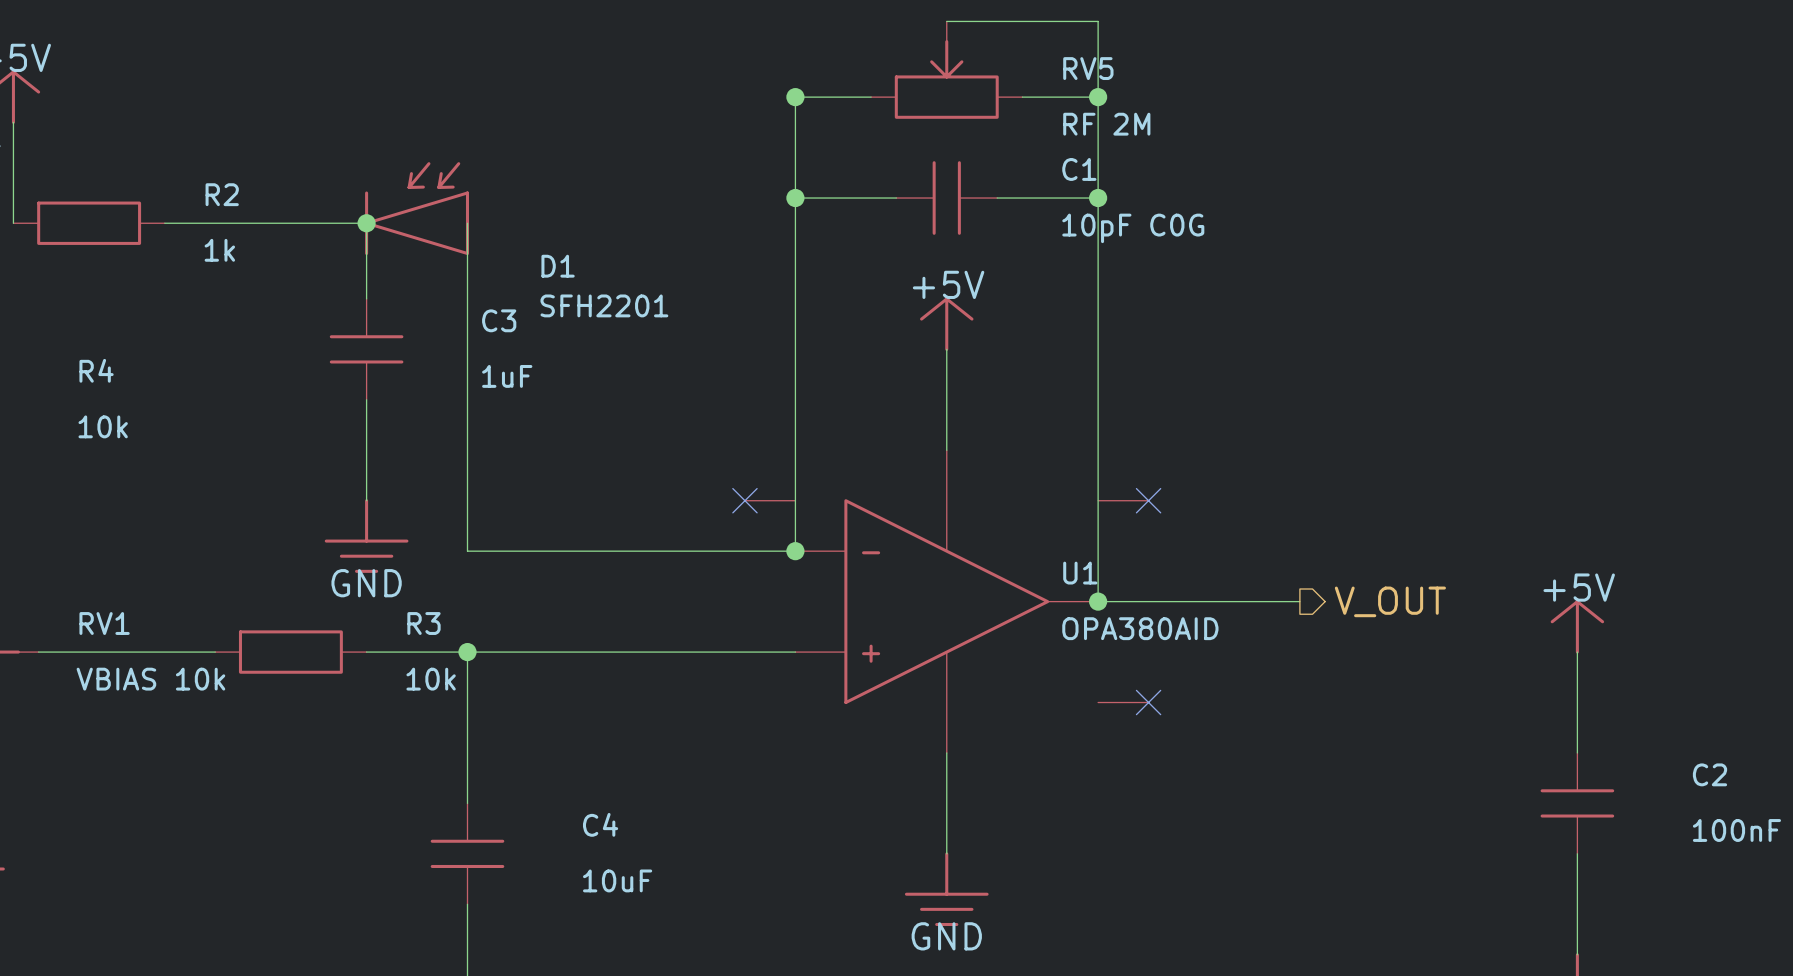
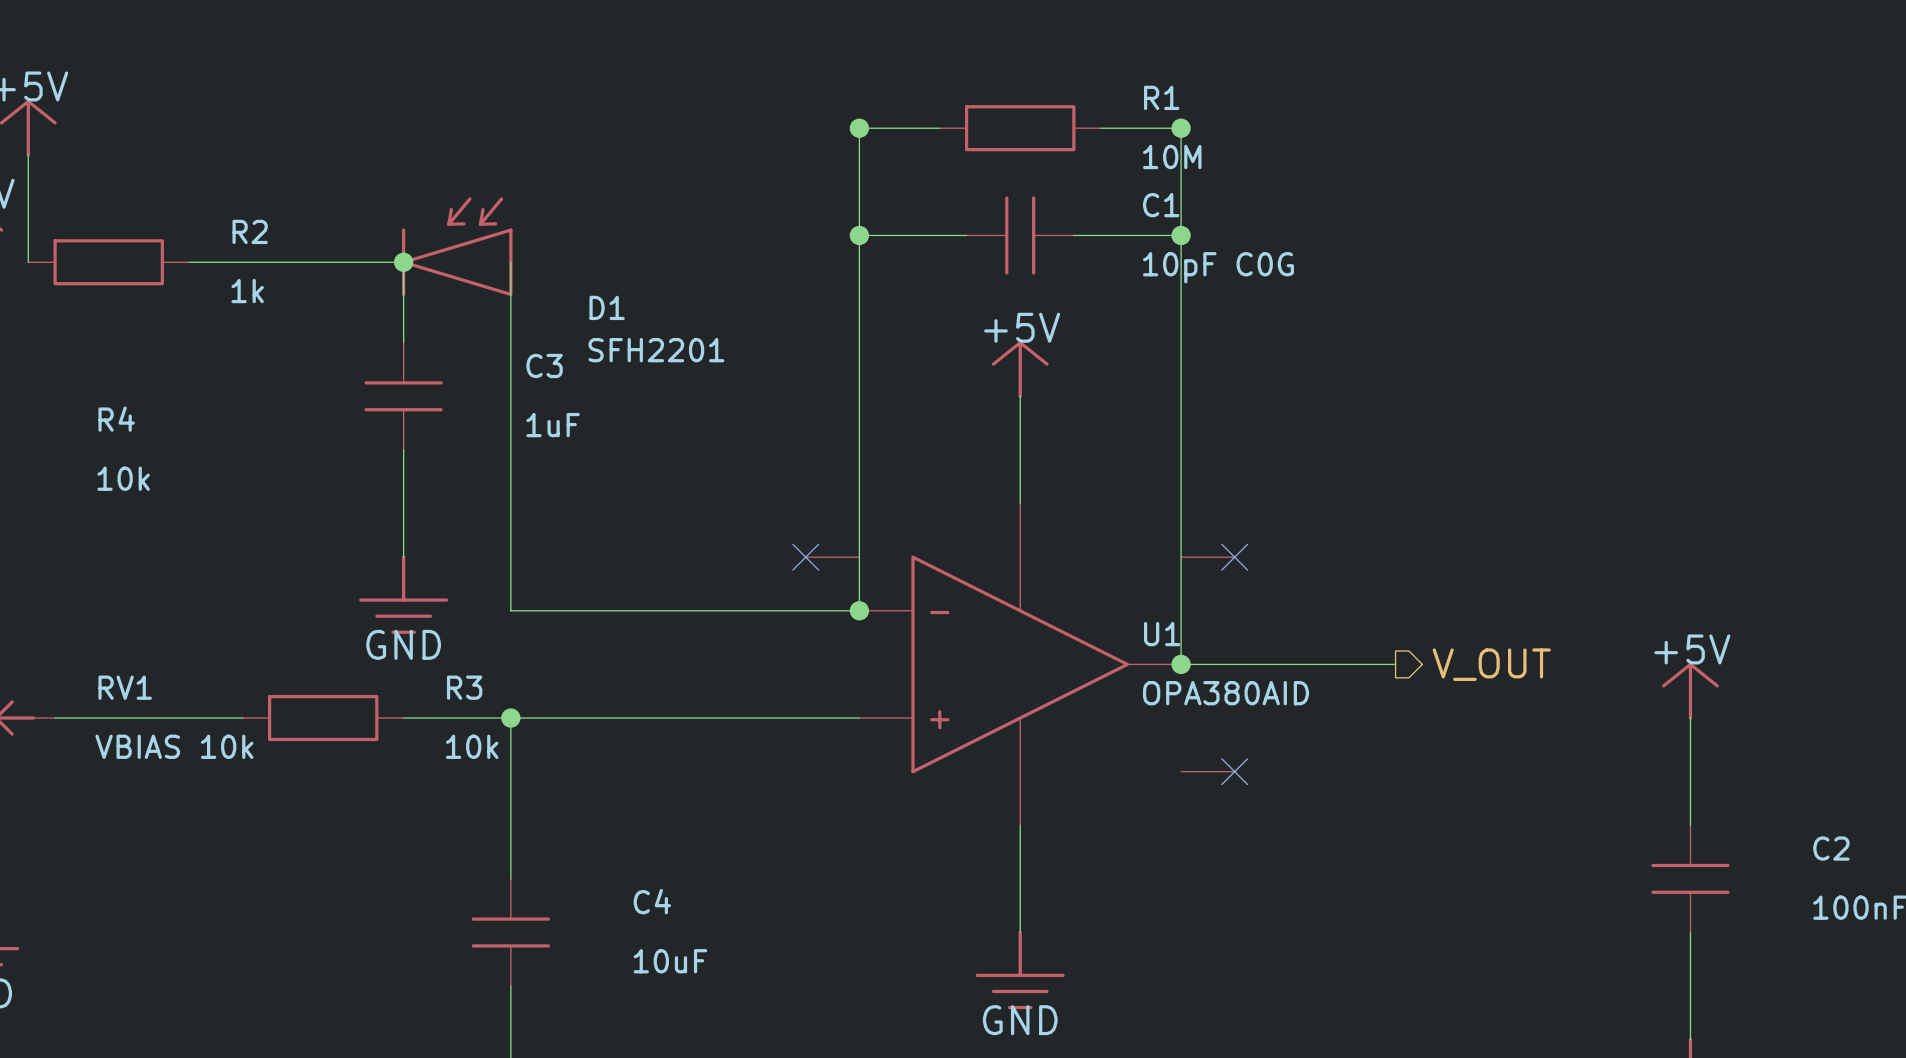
wire: (946, 21) (1098, 21) (1098, 97) -> none
RV5: RF 2M (946, 70) -> none
R1: none -> 10M (1020, 128)

